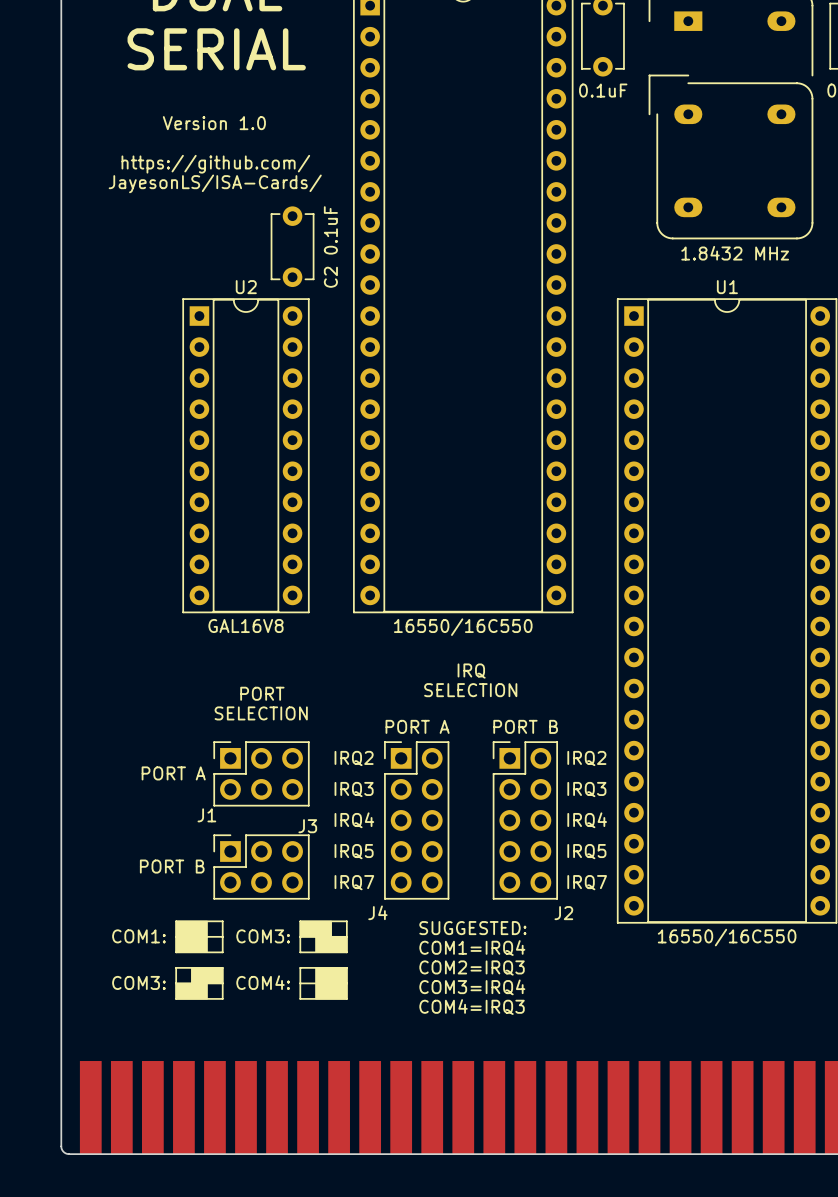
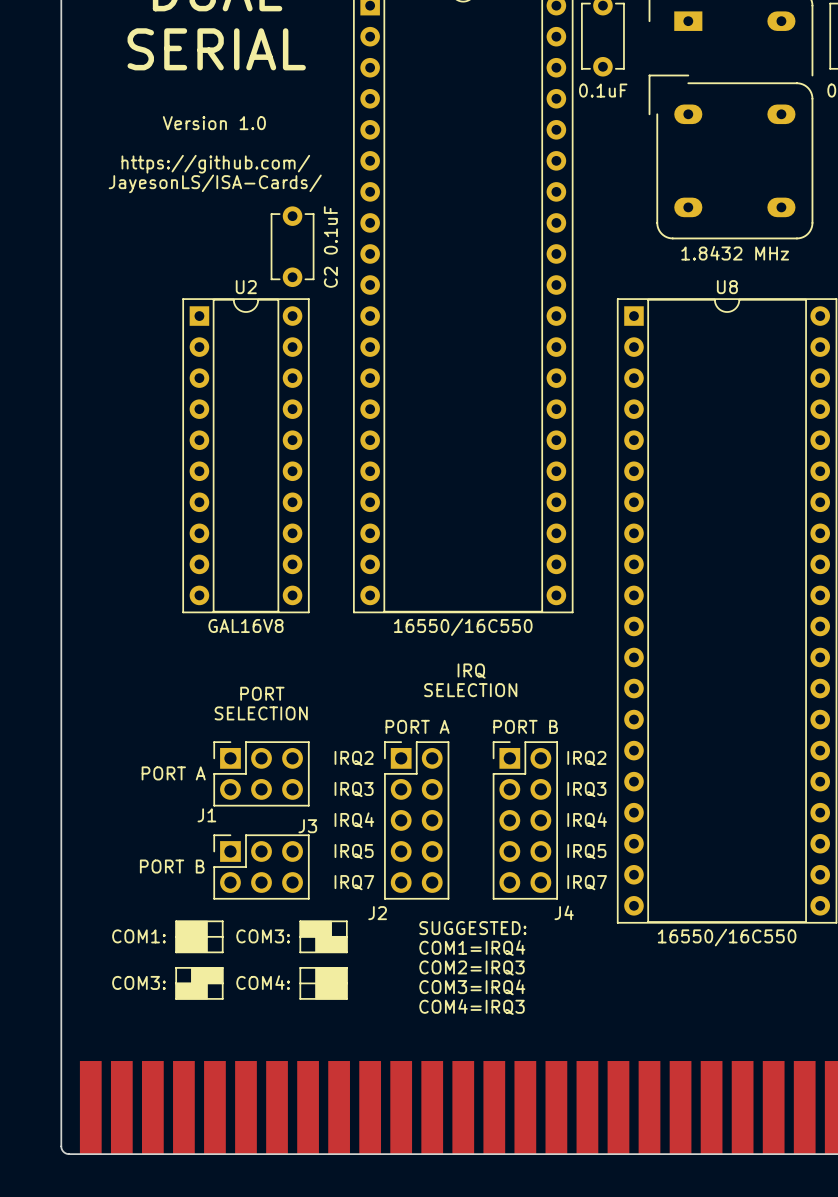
U1 name: U1 (727, 287) -> U8 (727, 287)
J4 name: J4 (377, 912) -> J2 (377, 913)
J2 name: J2 (563, 913) -> J4 (564, 912)

